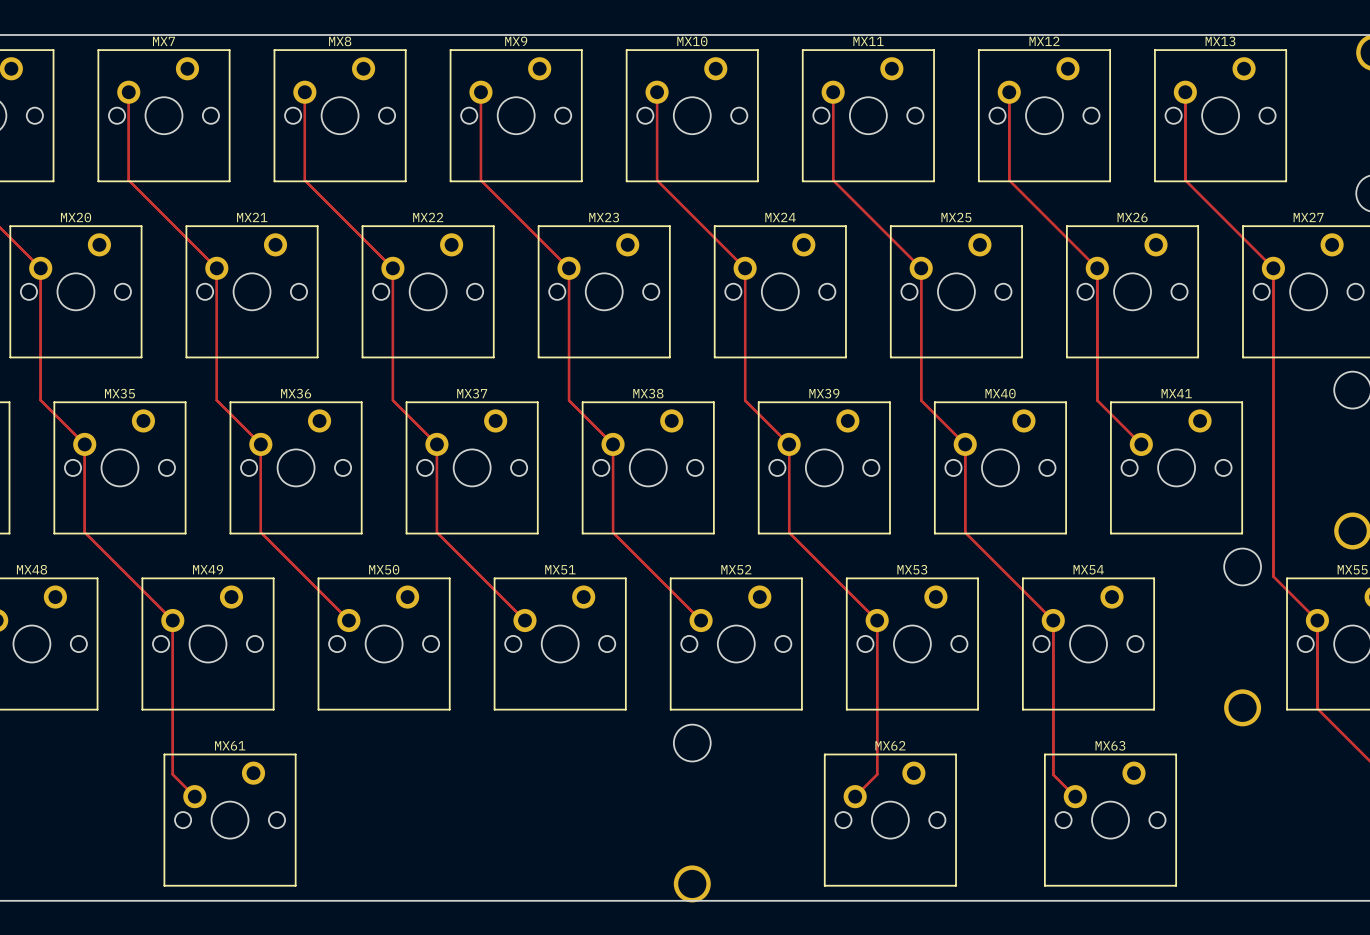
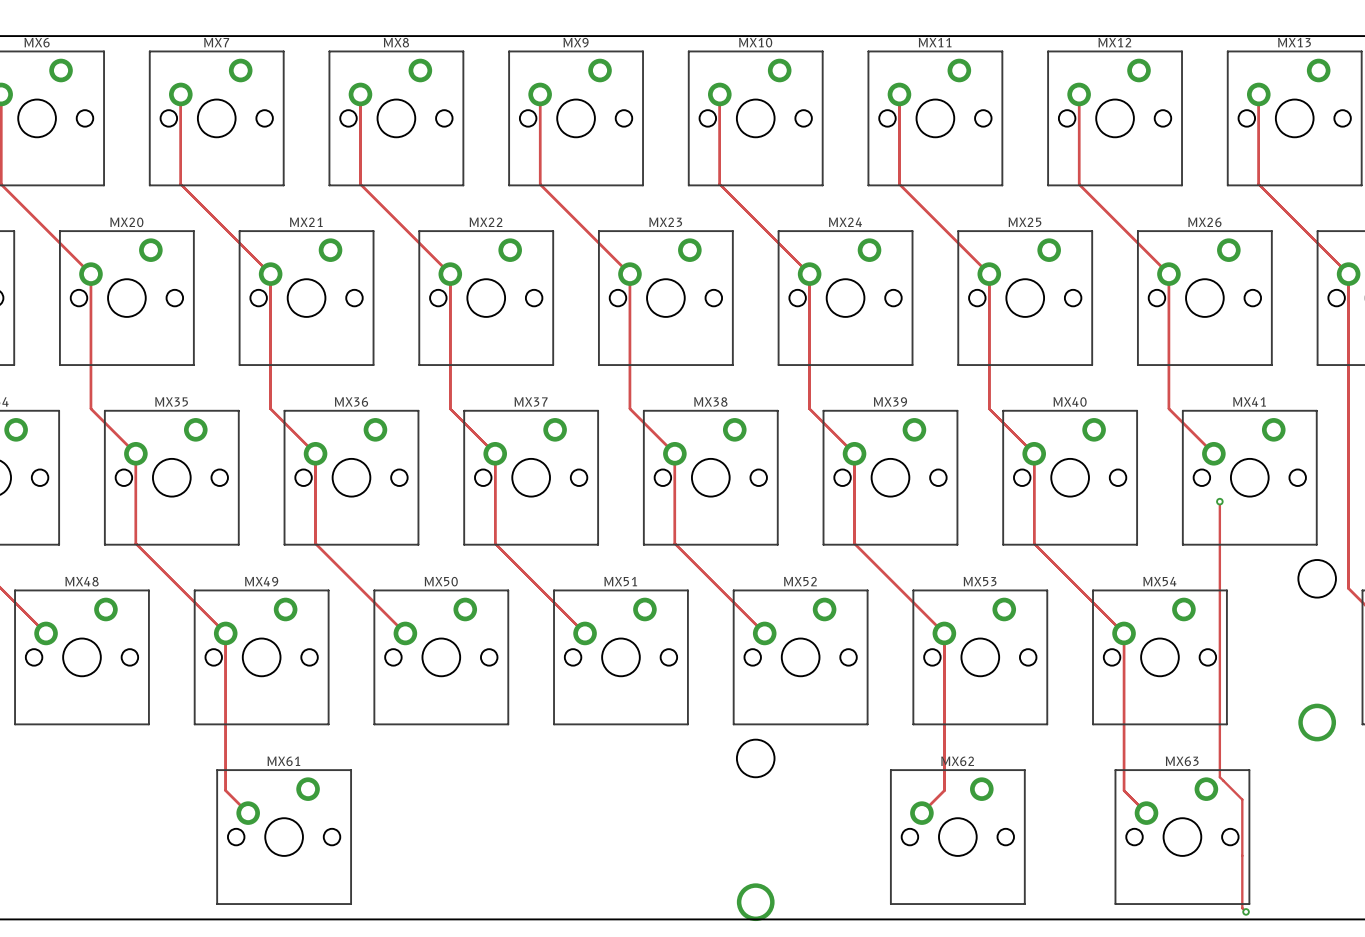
track: none -> (1219, 501) (1219, 777) (1242, 799) (1242, 908) (1246, 911)
via: none -> (1219, 501)
via: none -> (1246, 911)

